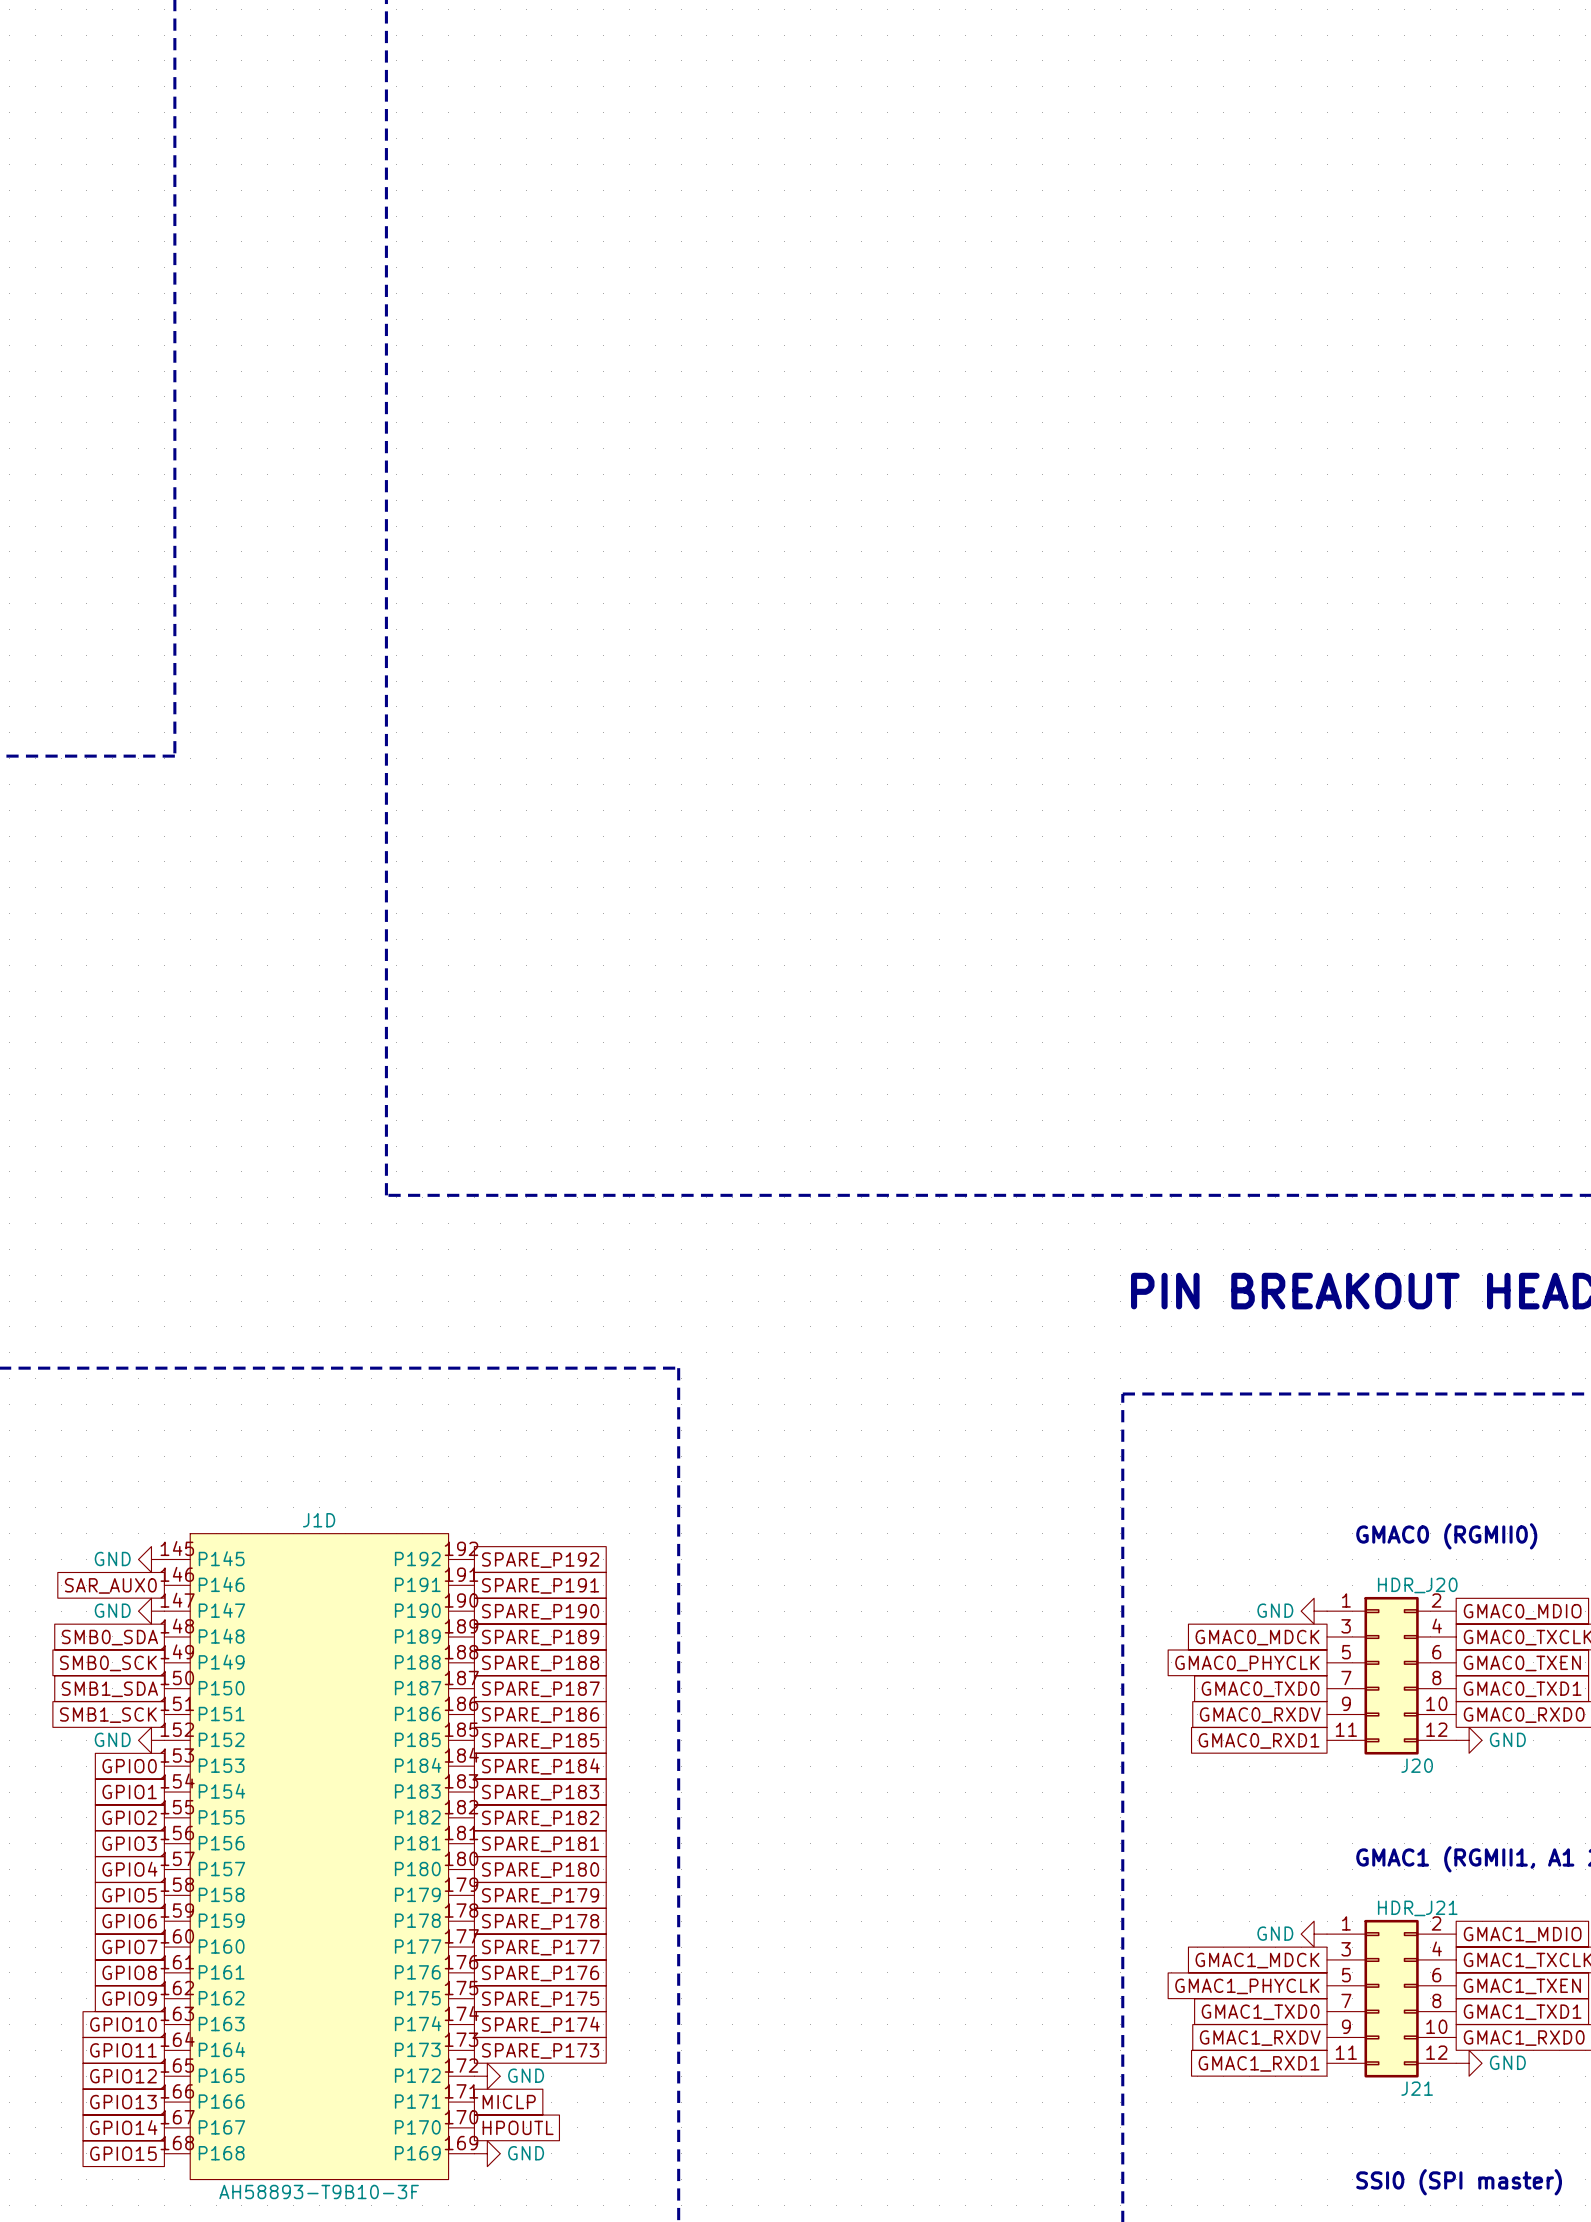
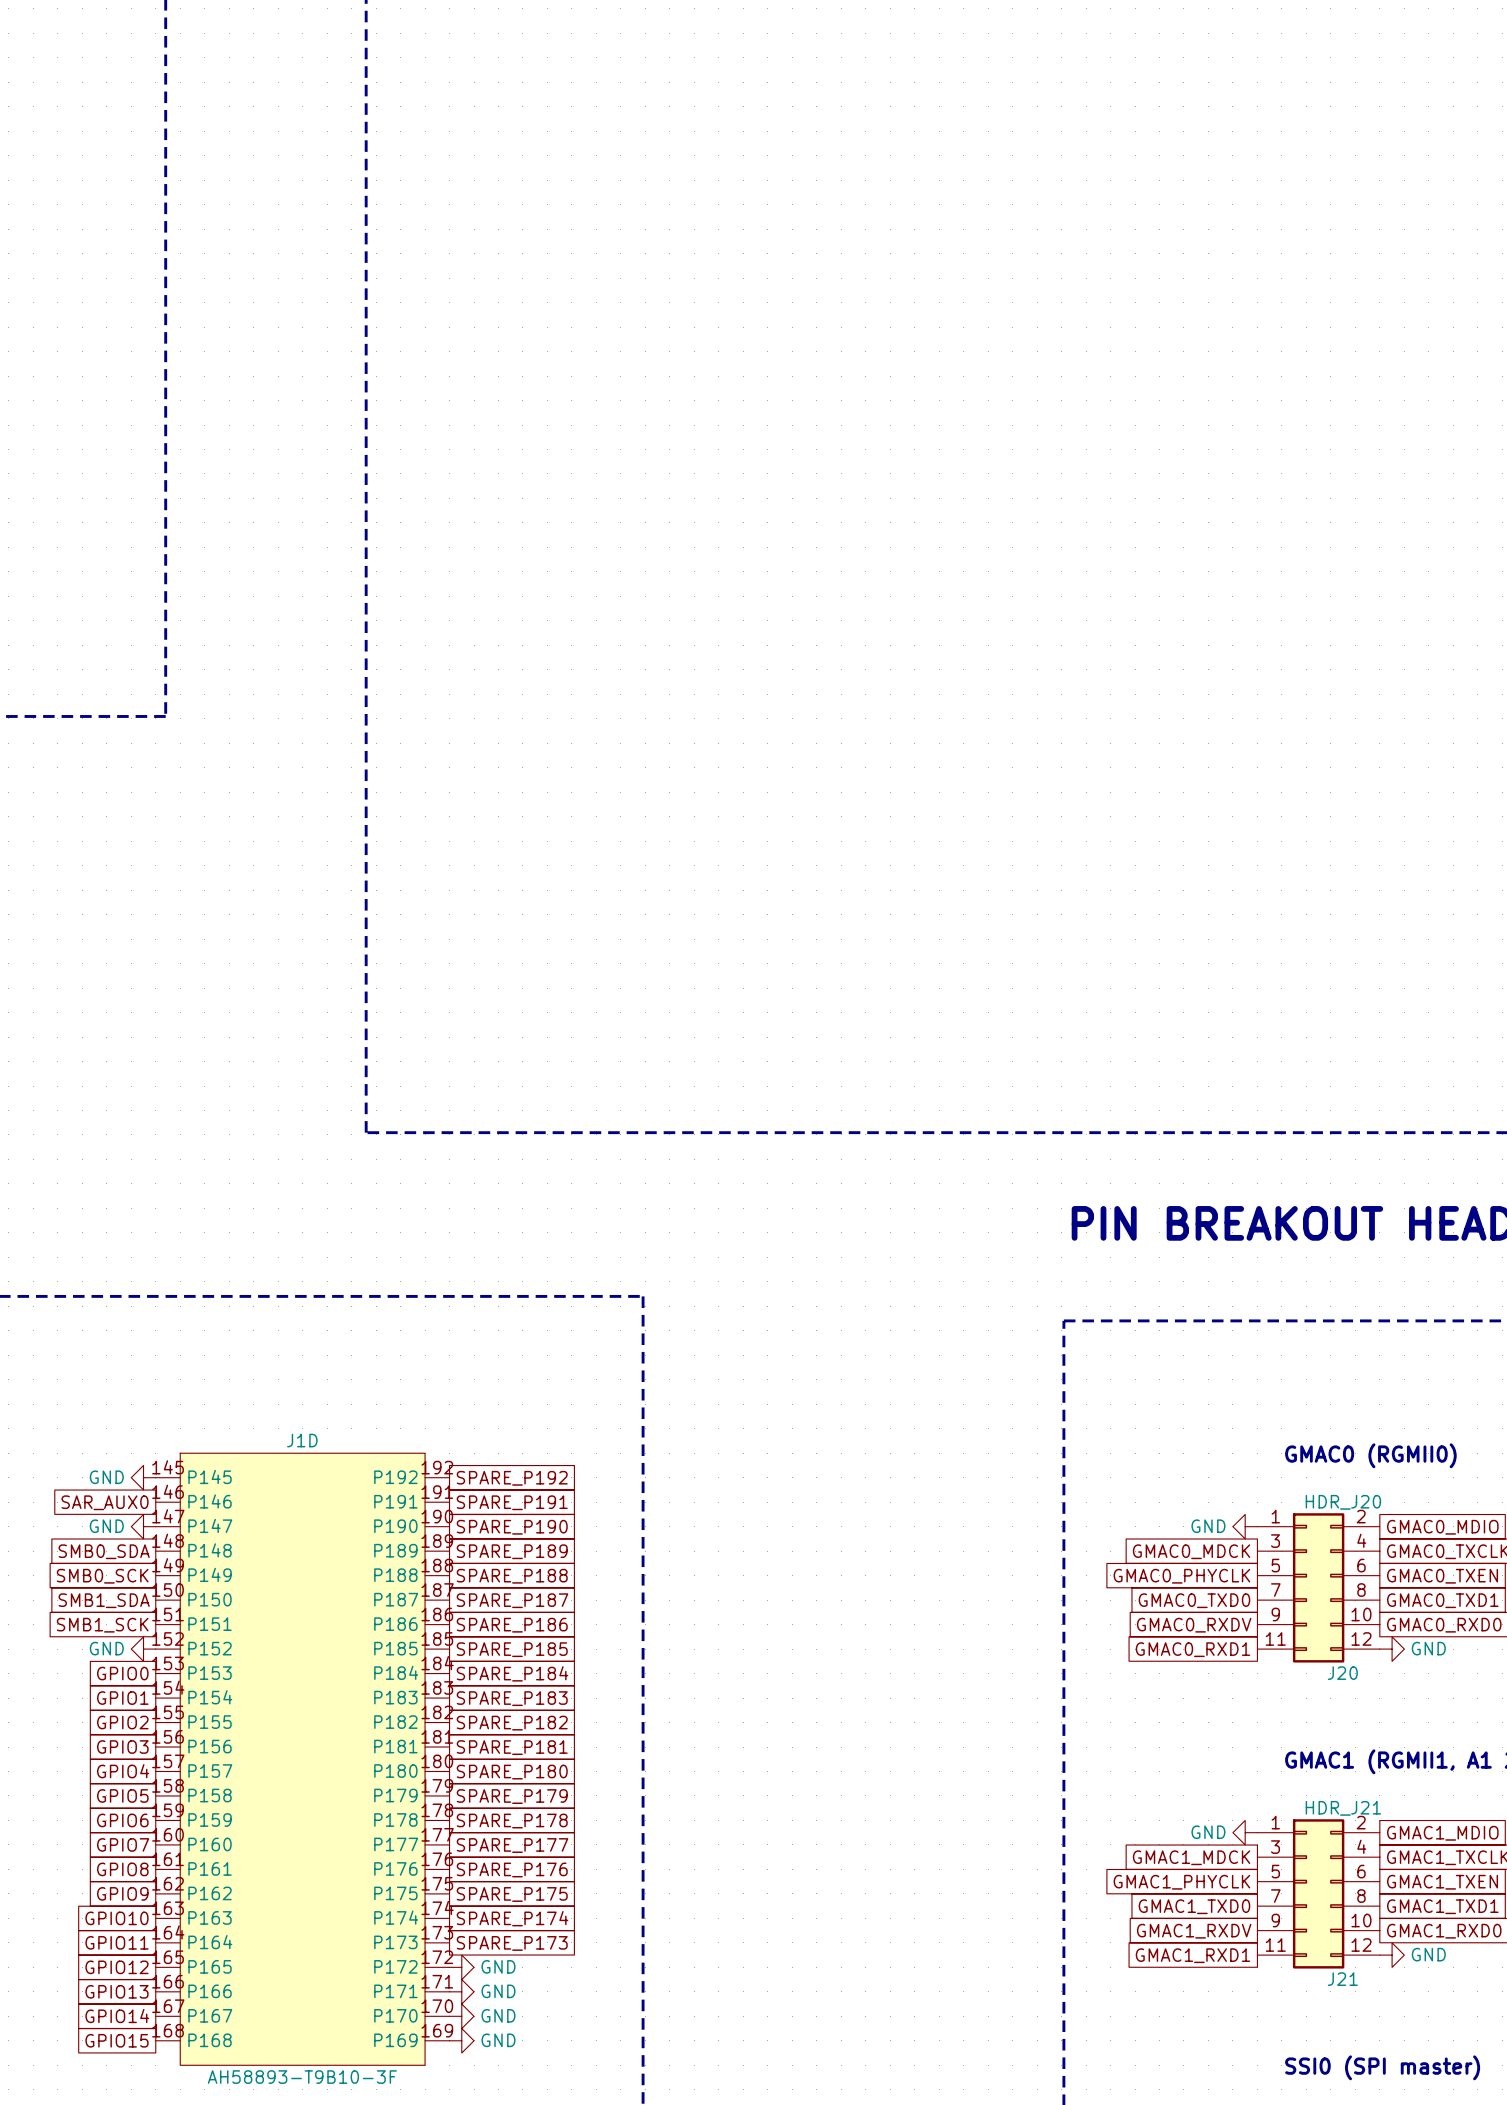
power symbol: none -> GND (461, 1991)
global label: MICLP (509, 2102) -> none
power symbol: none -> GND (461, 2016)
global label: HPOUTL (518, 2127) -> none

